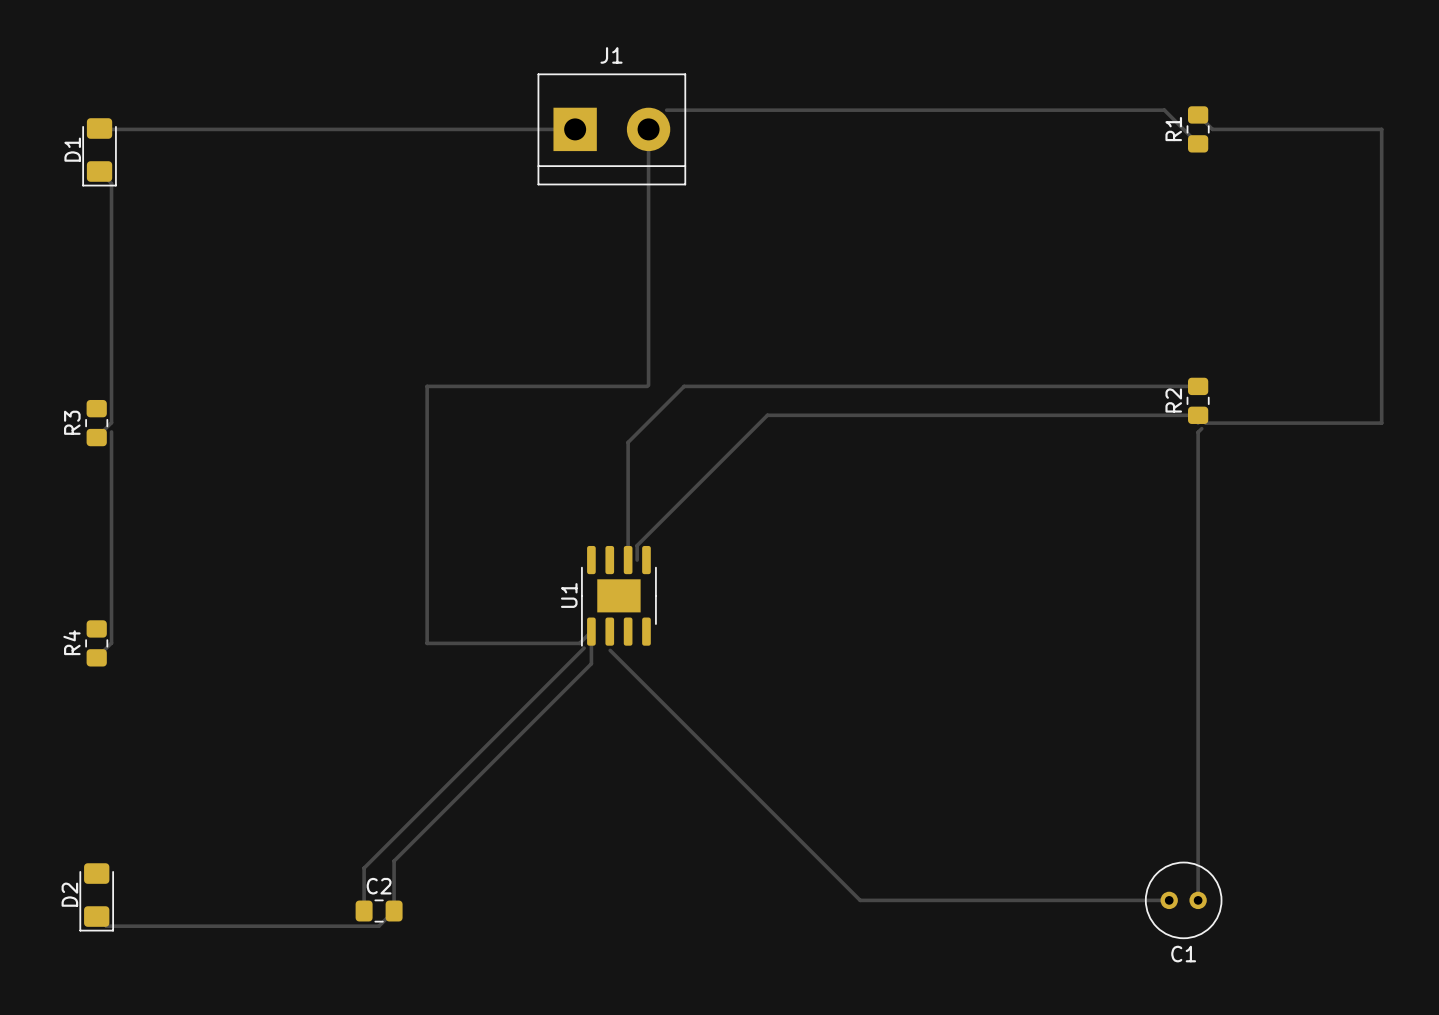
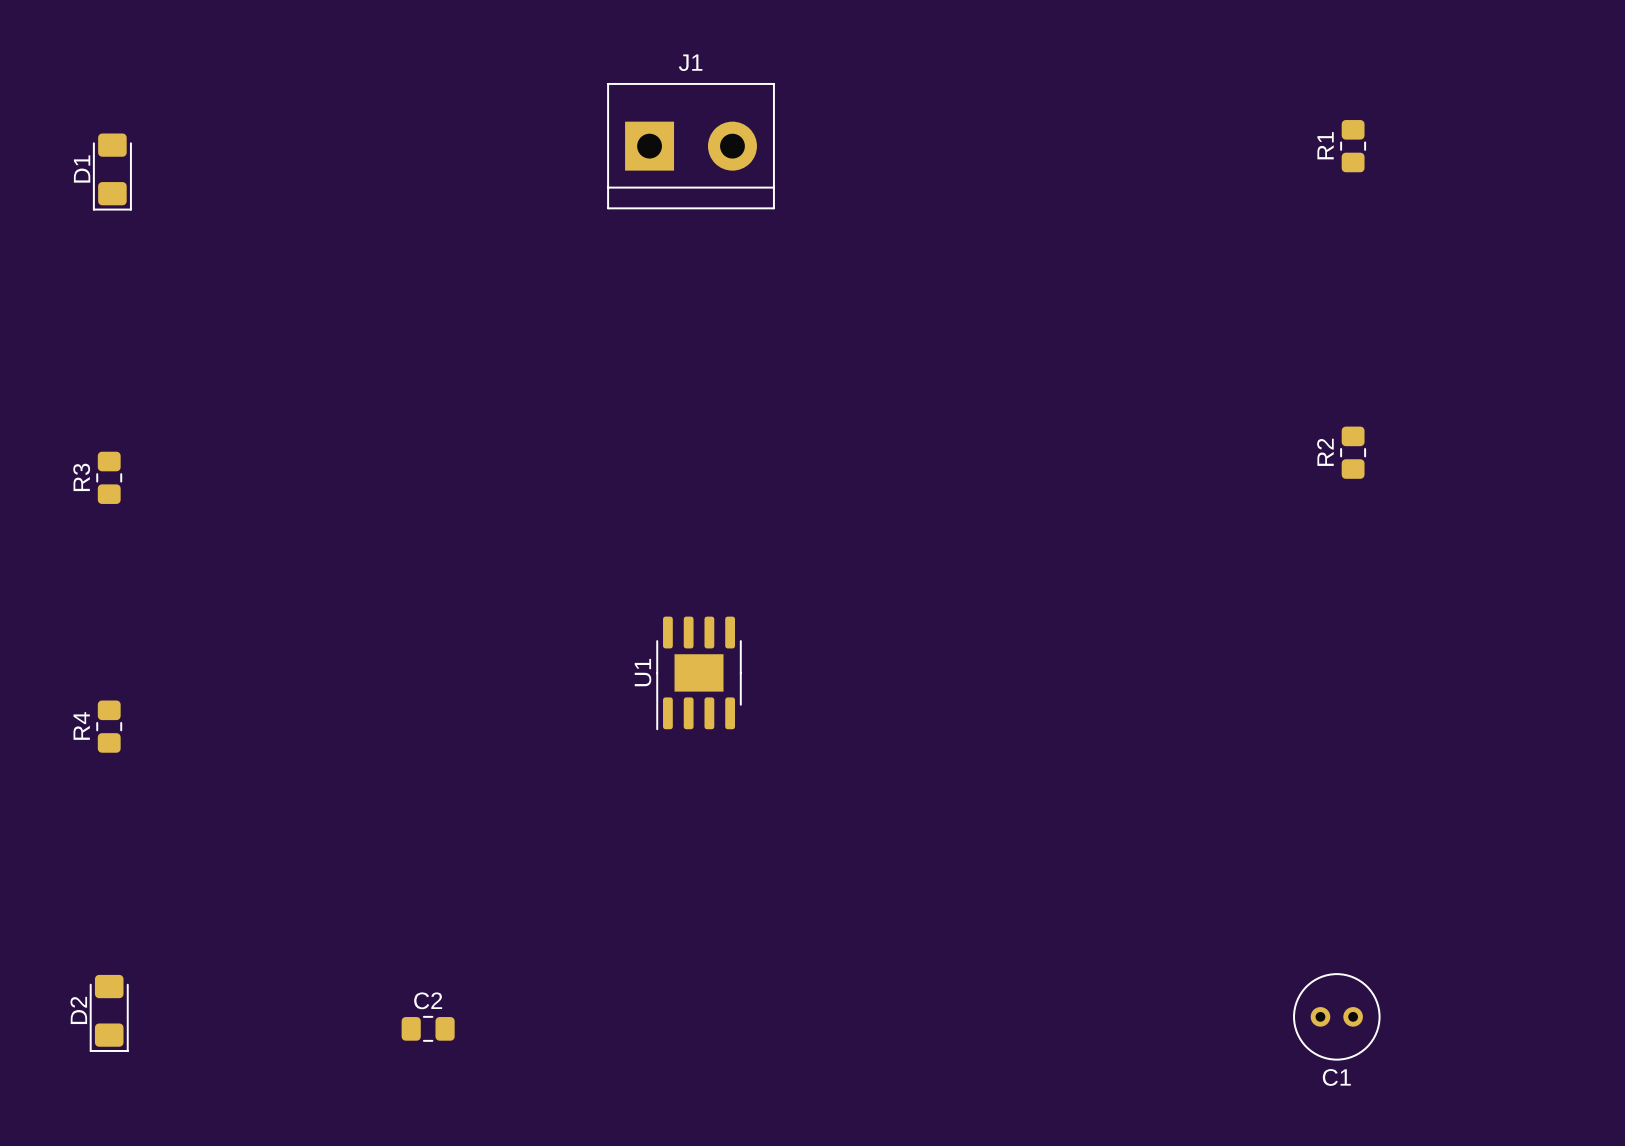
track: (666, 110) (1164, 110) (1198, 143) -> none
track: (1198, 114) (1212, 129) (1381, 129) (1381, 423) (1205, 423) (1198, 415) -> none
track: (99, 128) (575, 129) -> none
track: (648, 129) (648, 385) -> none
track: (99, 171) (111, 183) (111, 422) (96, 437) -> none
track: (647, 386) (427, 386) (427, 643) (579, 643) (591, 631) (591, 663) (394, 861) (394, 911) (378, 926) (106, 926) (96, 916) -> none
track: (1198, 386) (684, 386) (628, 442) (628, 560) -> none
track: (1198, 415) (767, 415) (637, 545) (637, 560) -> none
track: (1201, 428) (1198, 432) (1198, 900) -> none
track: (111, 431) (111, 643) (96, 657) -> none
track: (584, 648) (364, 868) (364, 911) -> none
track: (610, 650) (860, 900) (1169, 900) -> none

